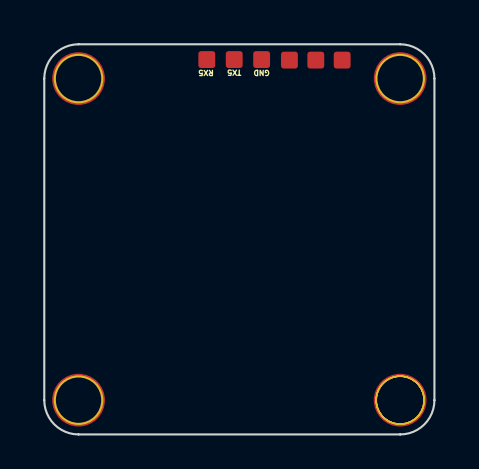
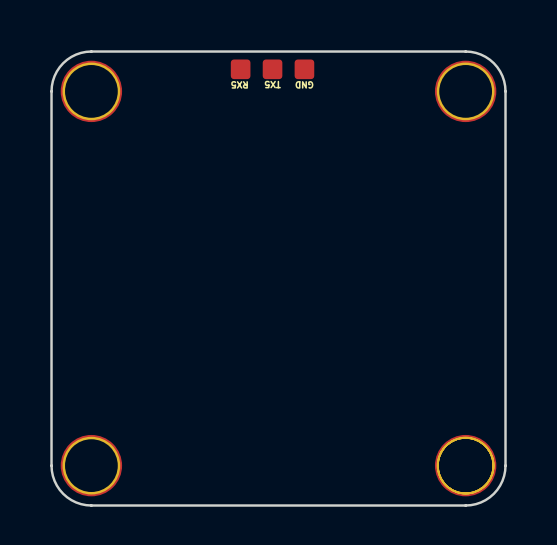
part: (315, 60) -> none

